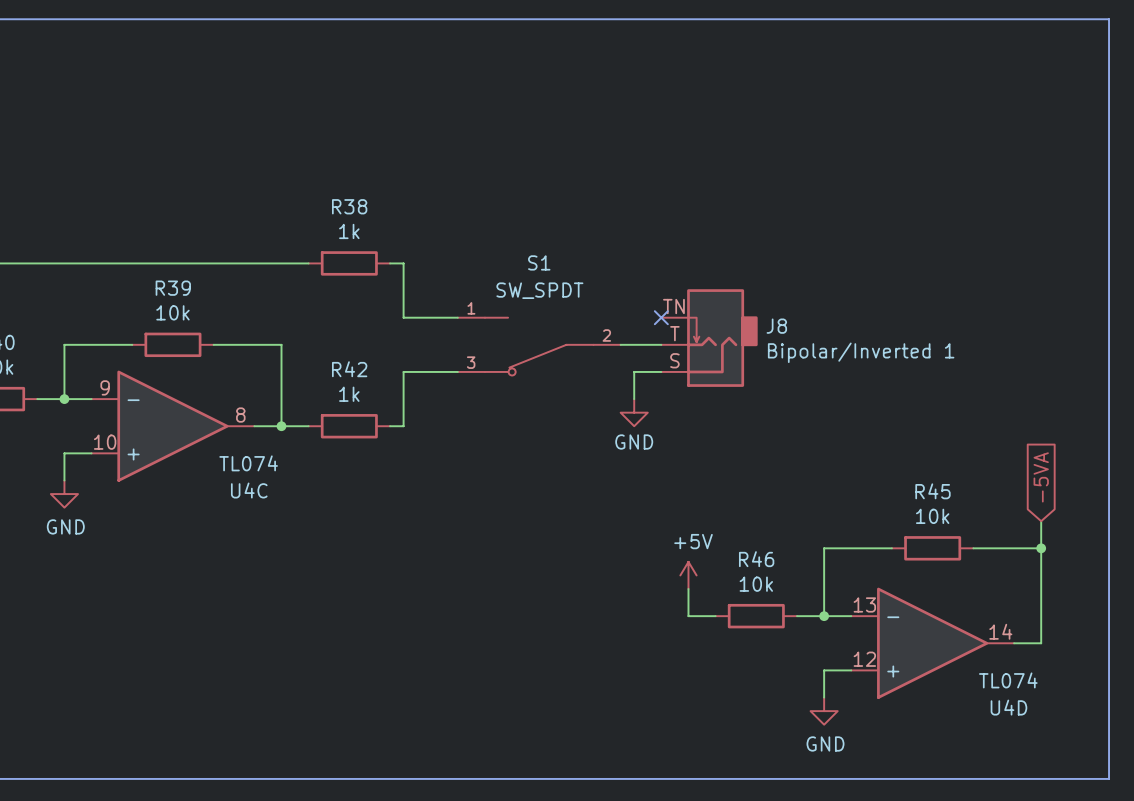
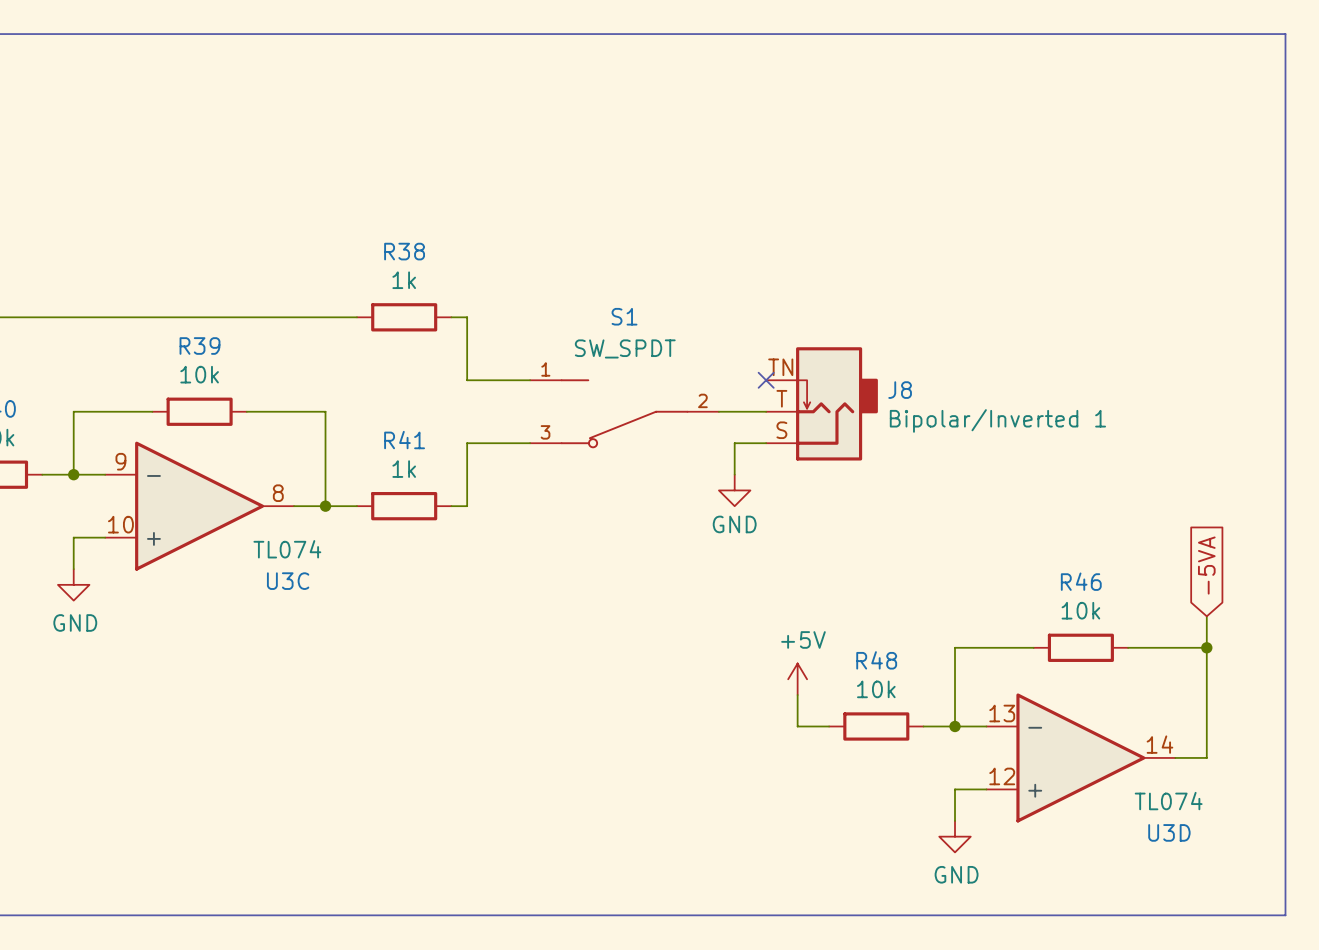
R42 name: R42 (349, 369) -> R41 (404, 440)
U4C name: U4C (249, 490) -> U3C (288, 581)
R45 name: R45 (932, 491) -> R46 (1081, 581)
R46 name: R46 (756, 559) -> R48 (876, 660)
U4D name: U4D (1008, 707) -> U3D (1169, 832)

